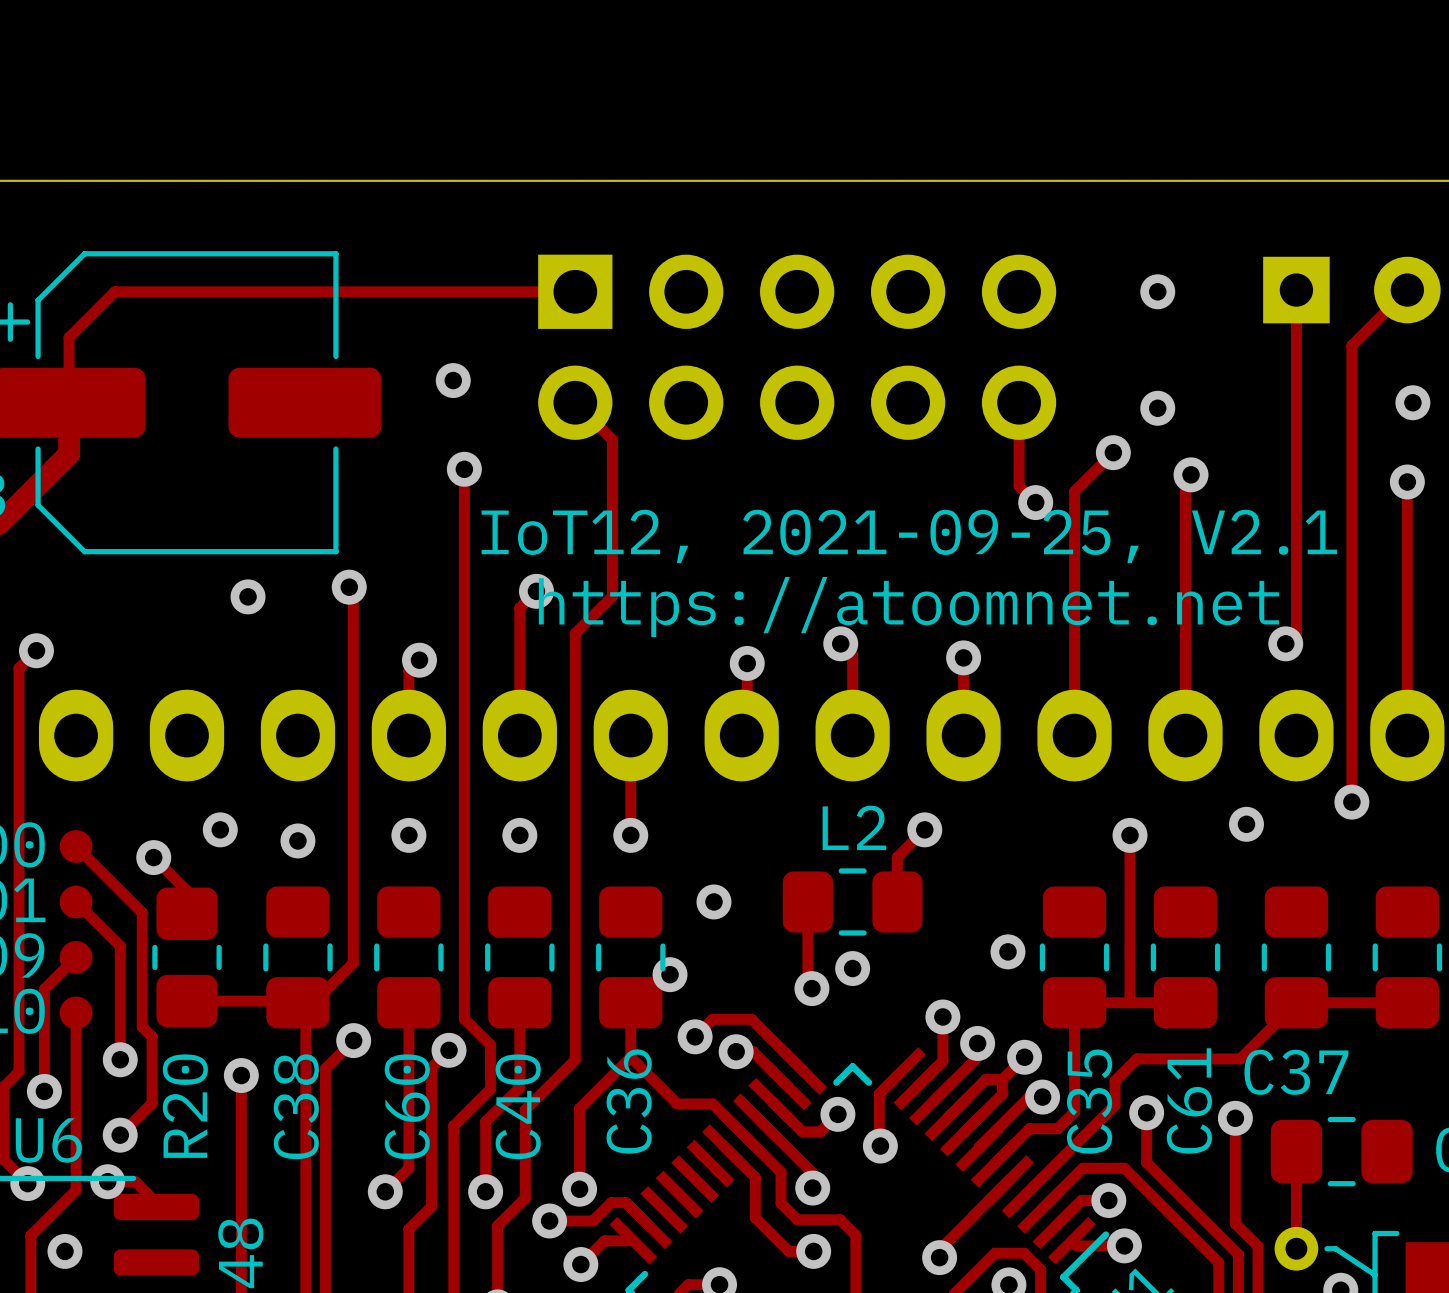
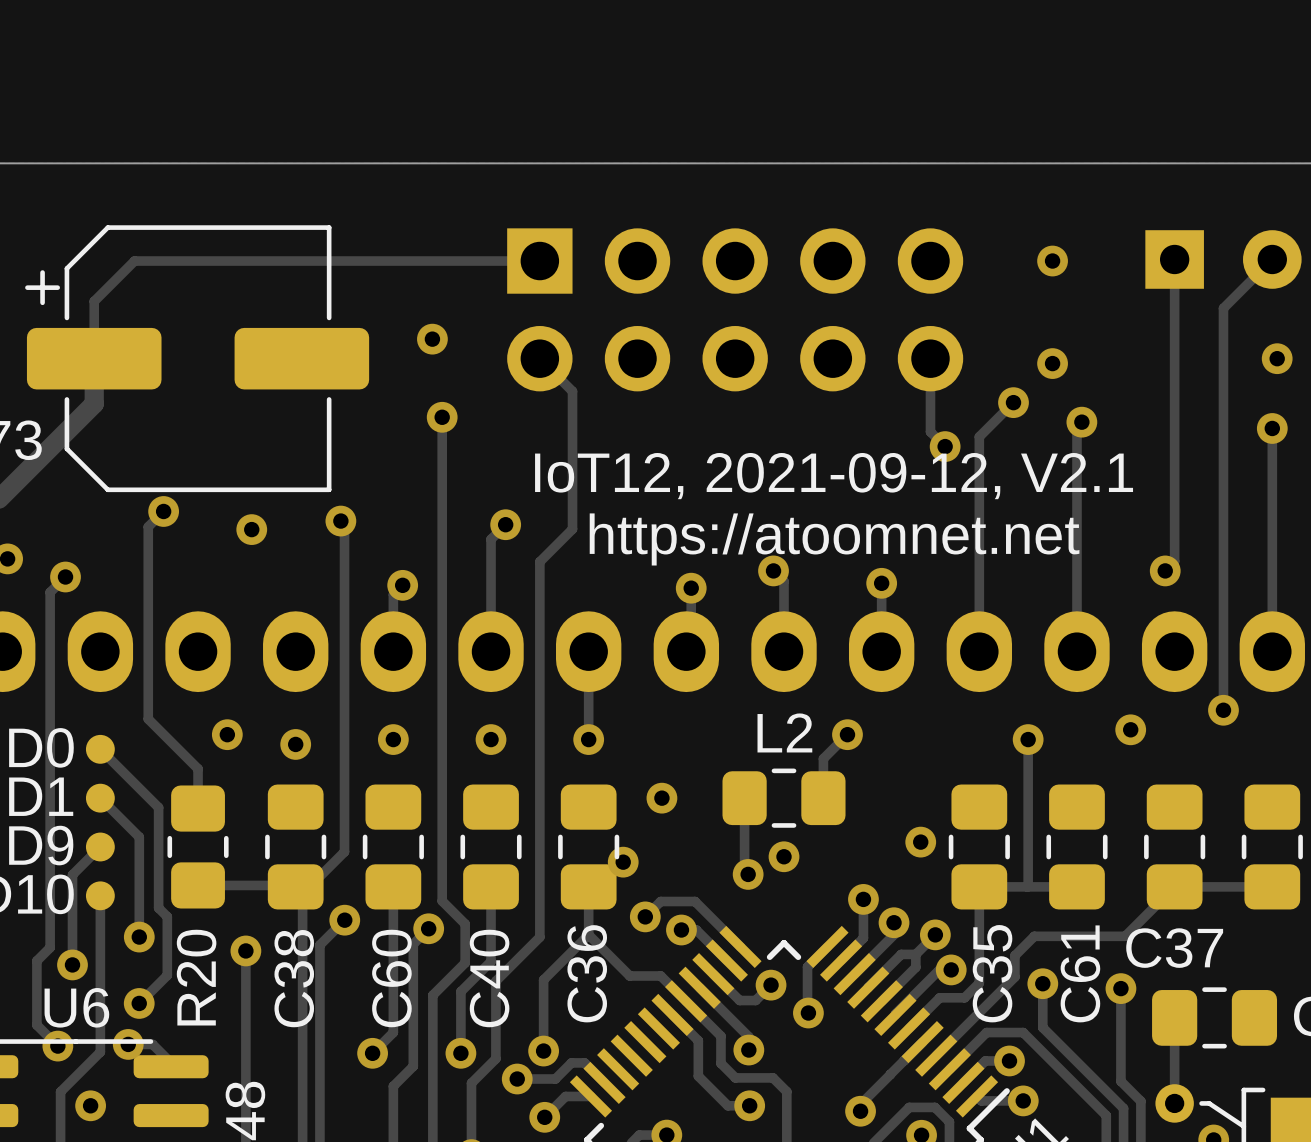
text: IoT12, 2021-09-25, V2.1 (909, 536) -> IoT12, 2021-09-12, V2.1 (834, 476)
via: none -> (163, 511)
track: (153, 857) (187, 890) -> (163, 511) (148, 526) (148, 719) (198, 768) (198, 788)
via: (153, 857) -> none

